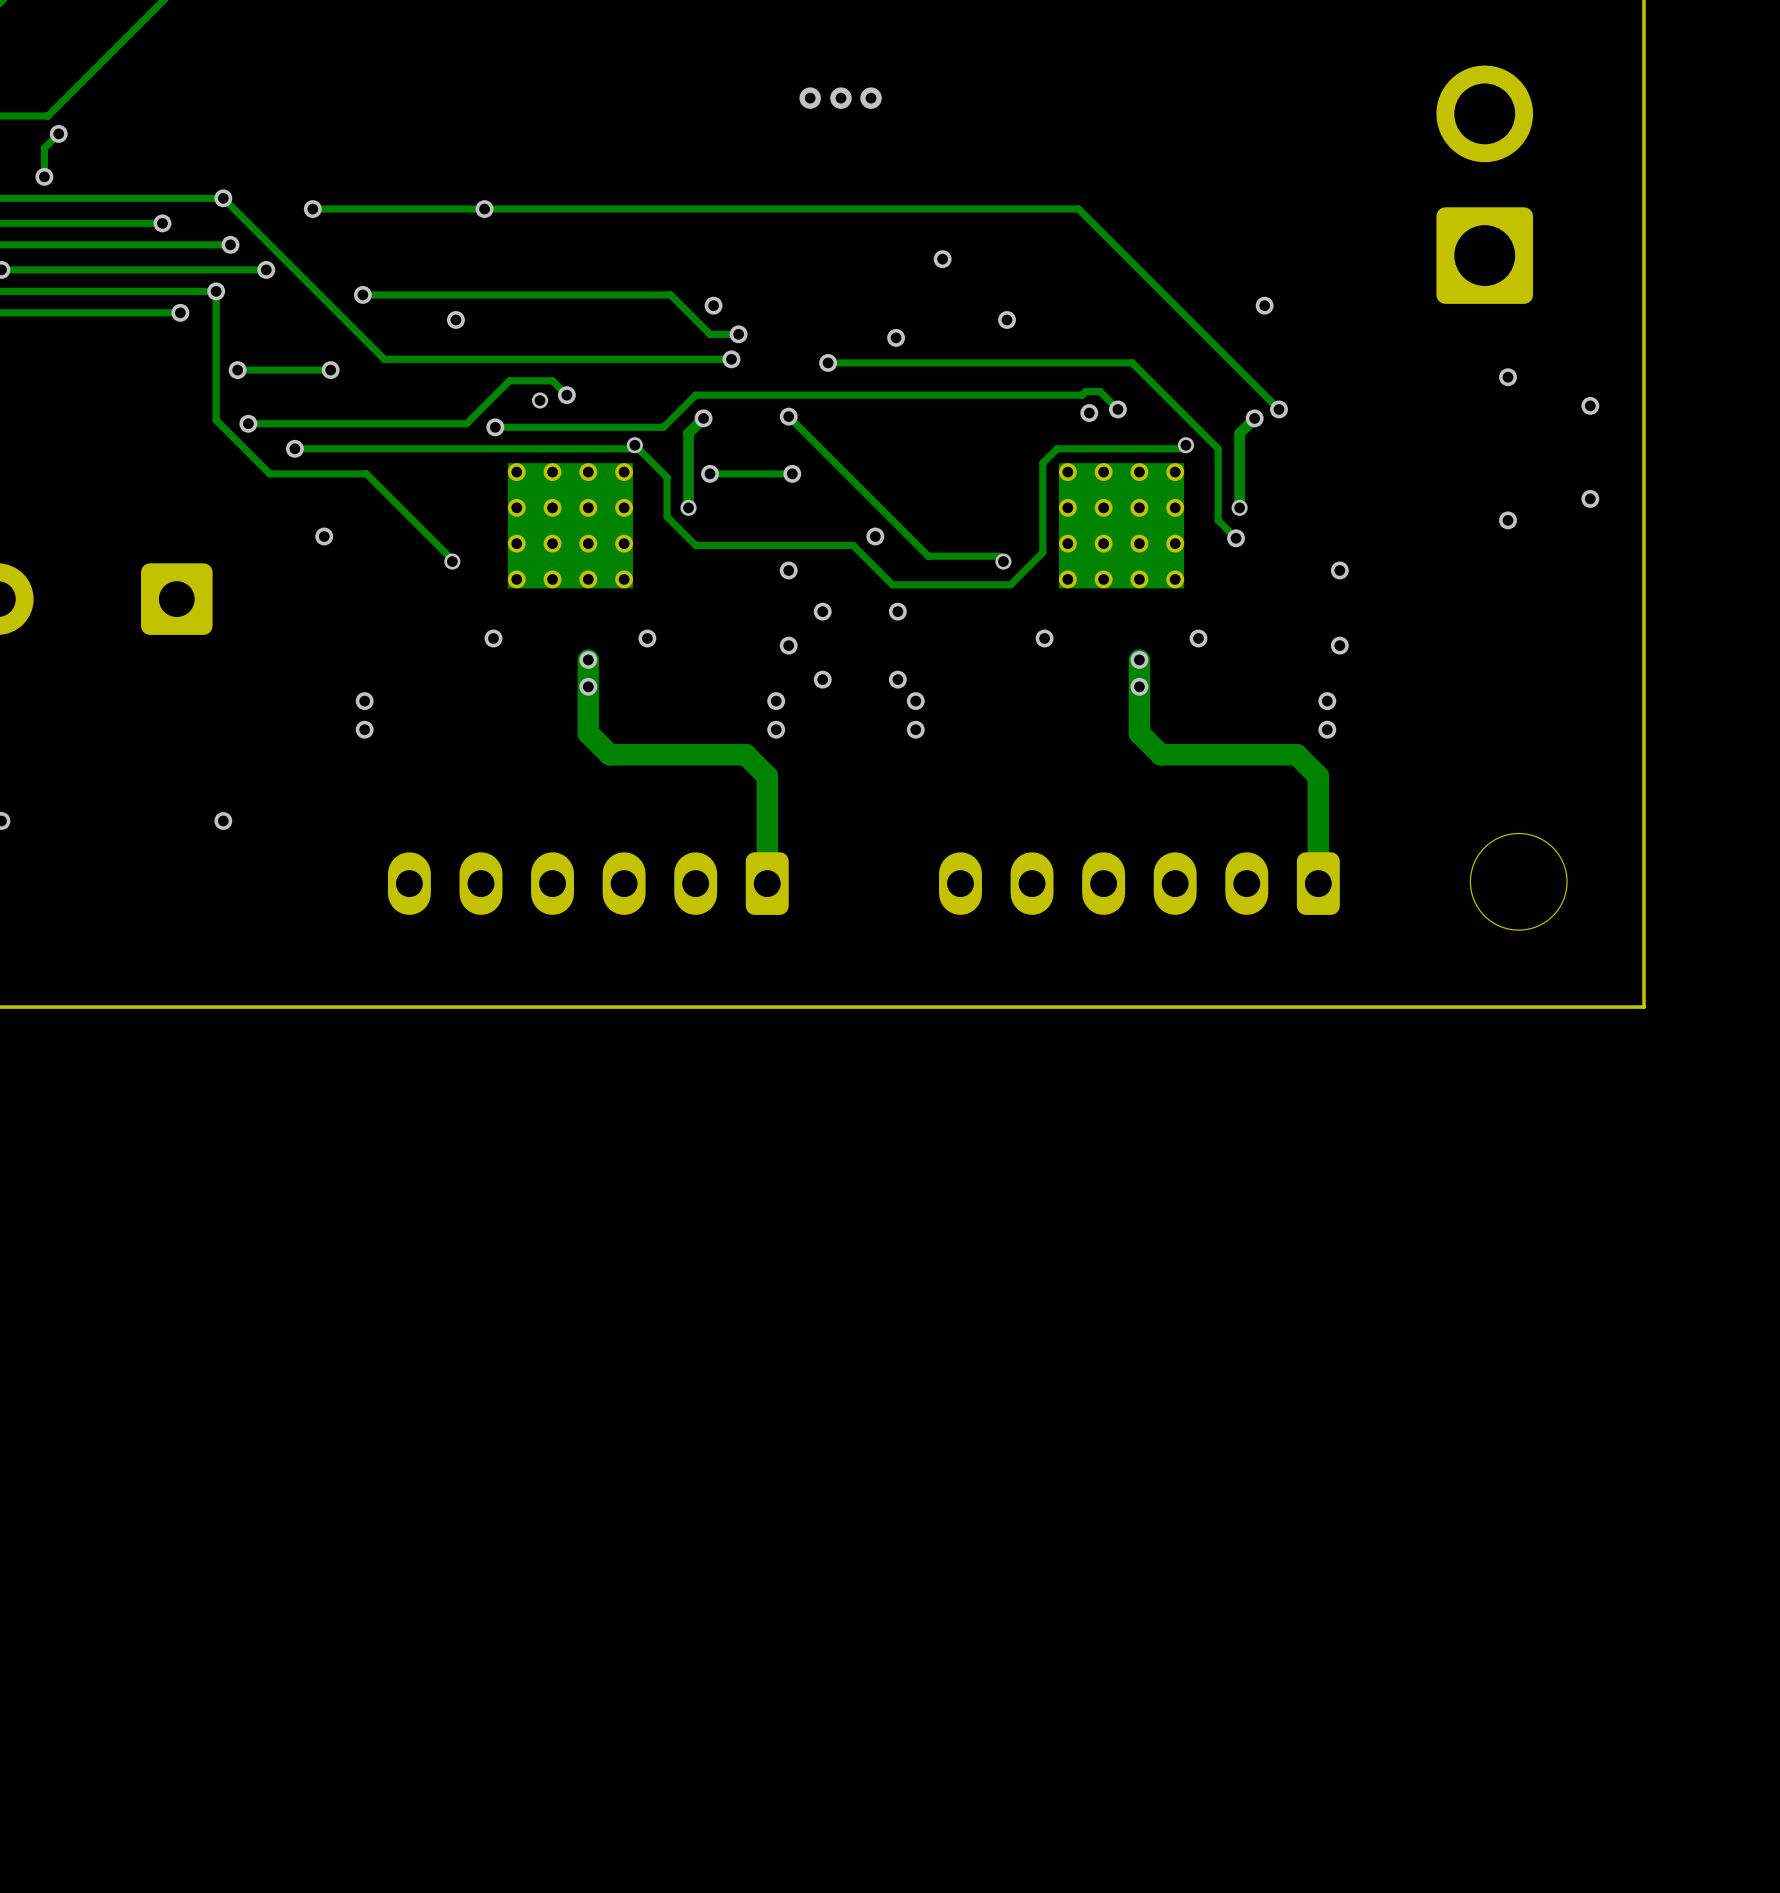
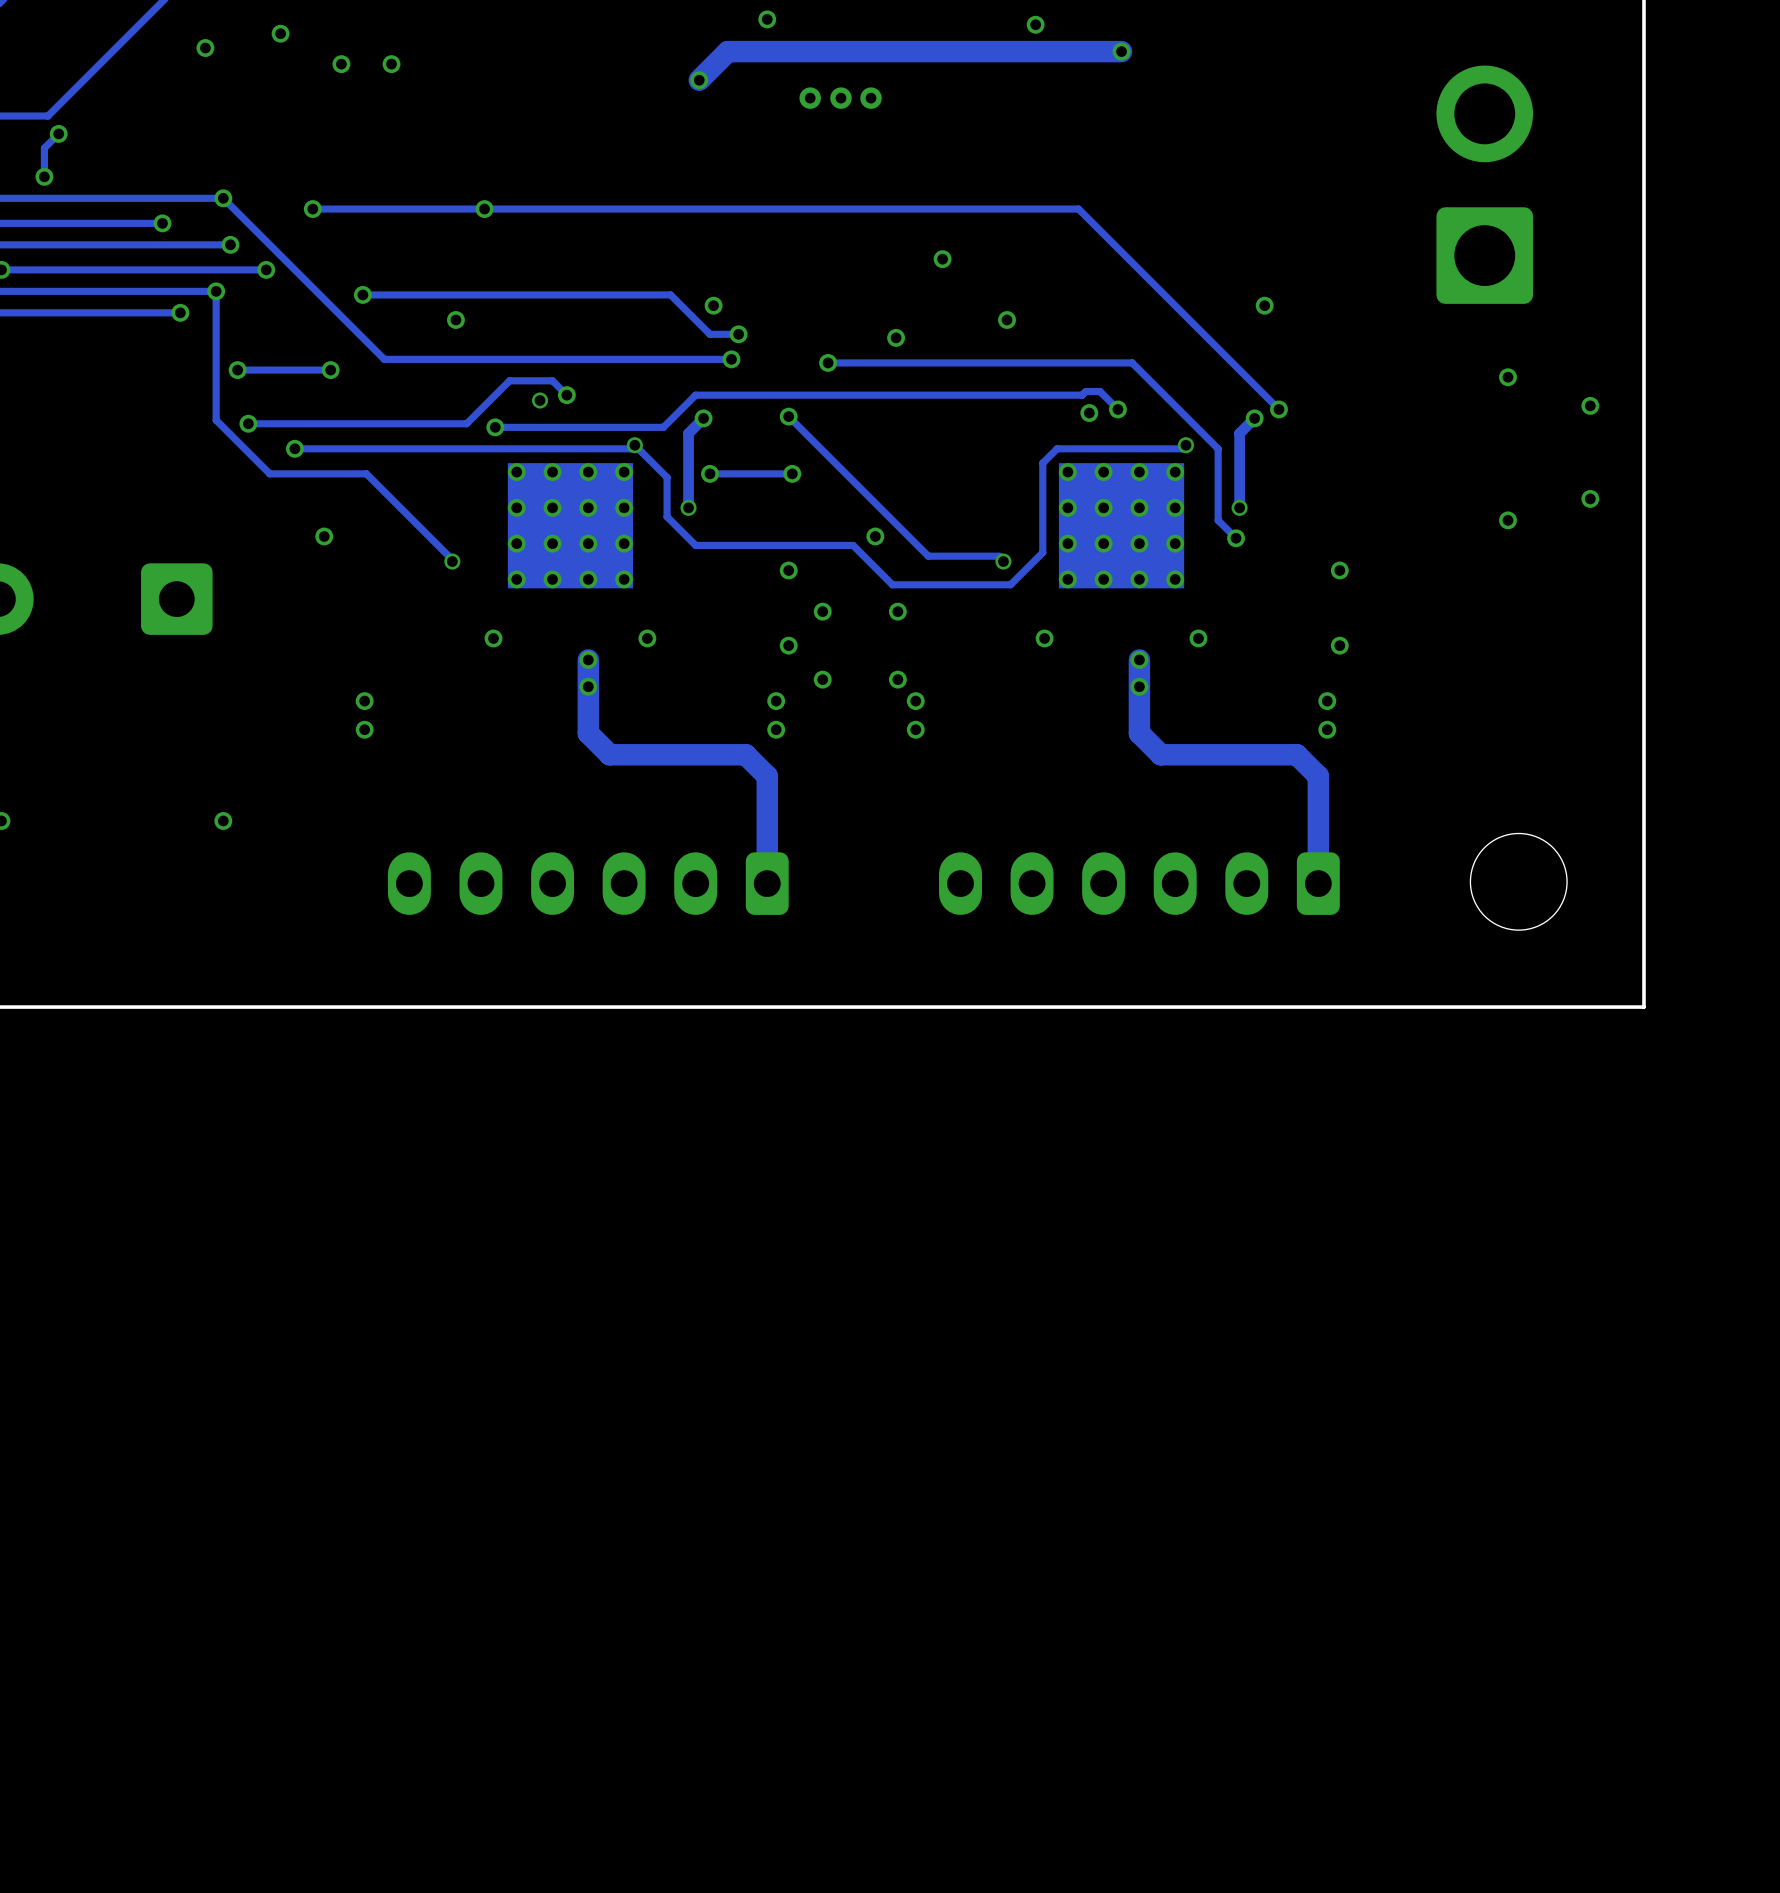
via: none -> (767, 19)
via: none -> (1035, 24)
via: none -> (280, 33)
via: none -> (205, 48)
track: none -> (1121, 51) (727, 51) (699, 80)
via: none -> (1121, 51)
via: none -> (341, 64)
via: none -> (391, 64)
via: none -> (699, 80)

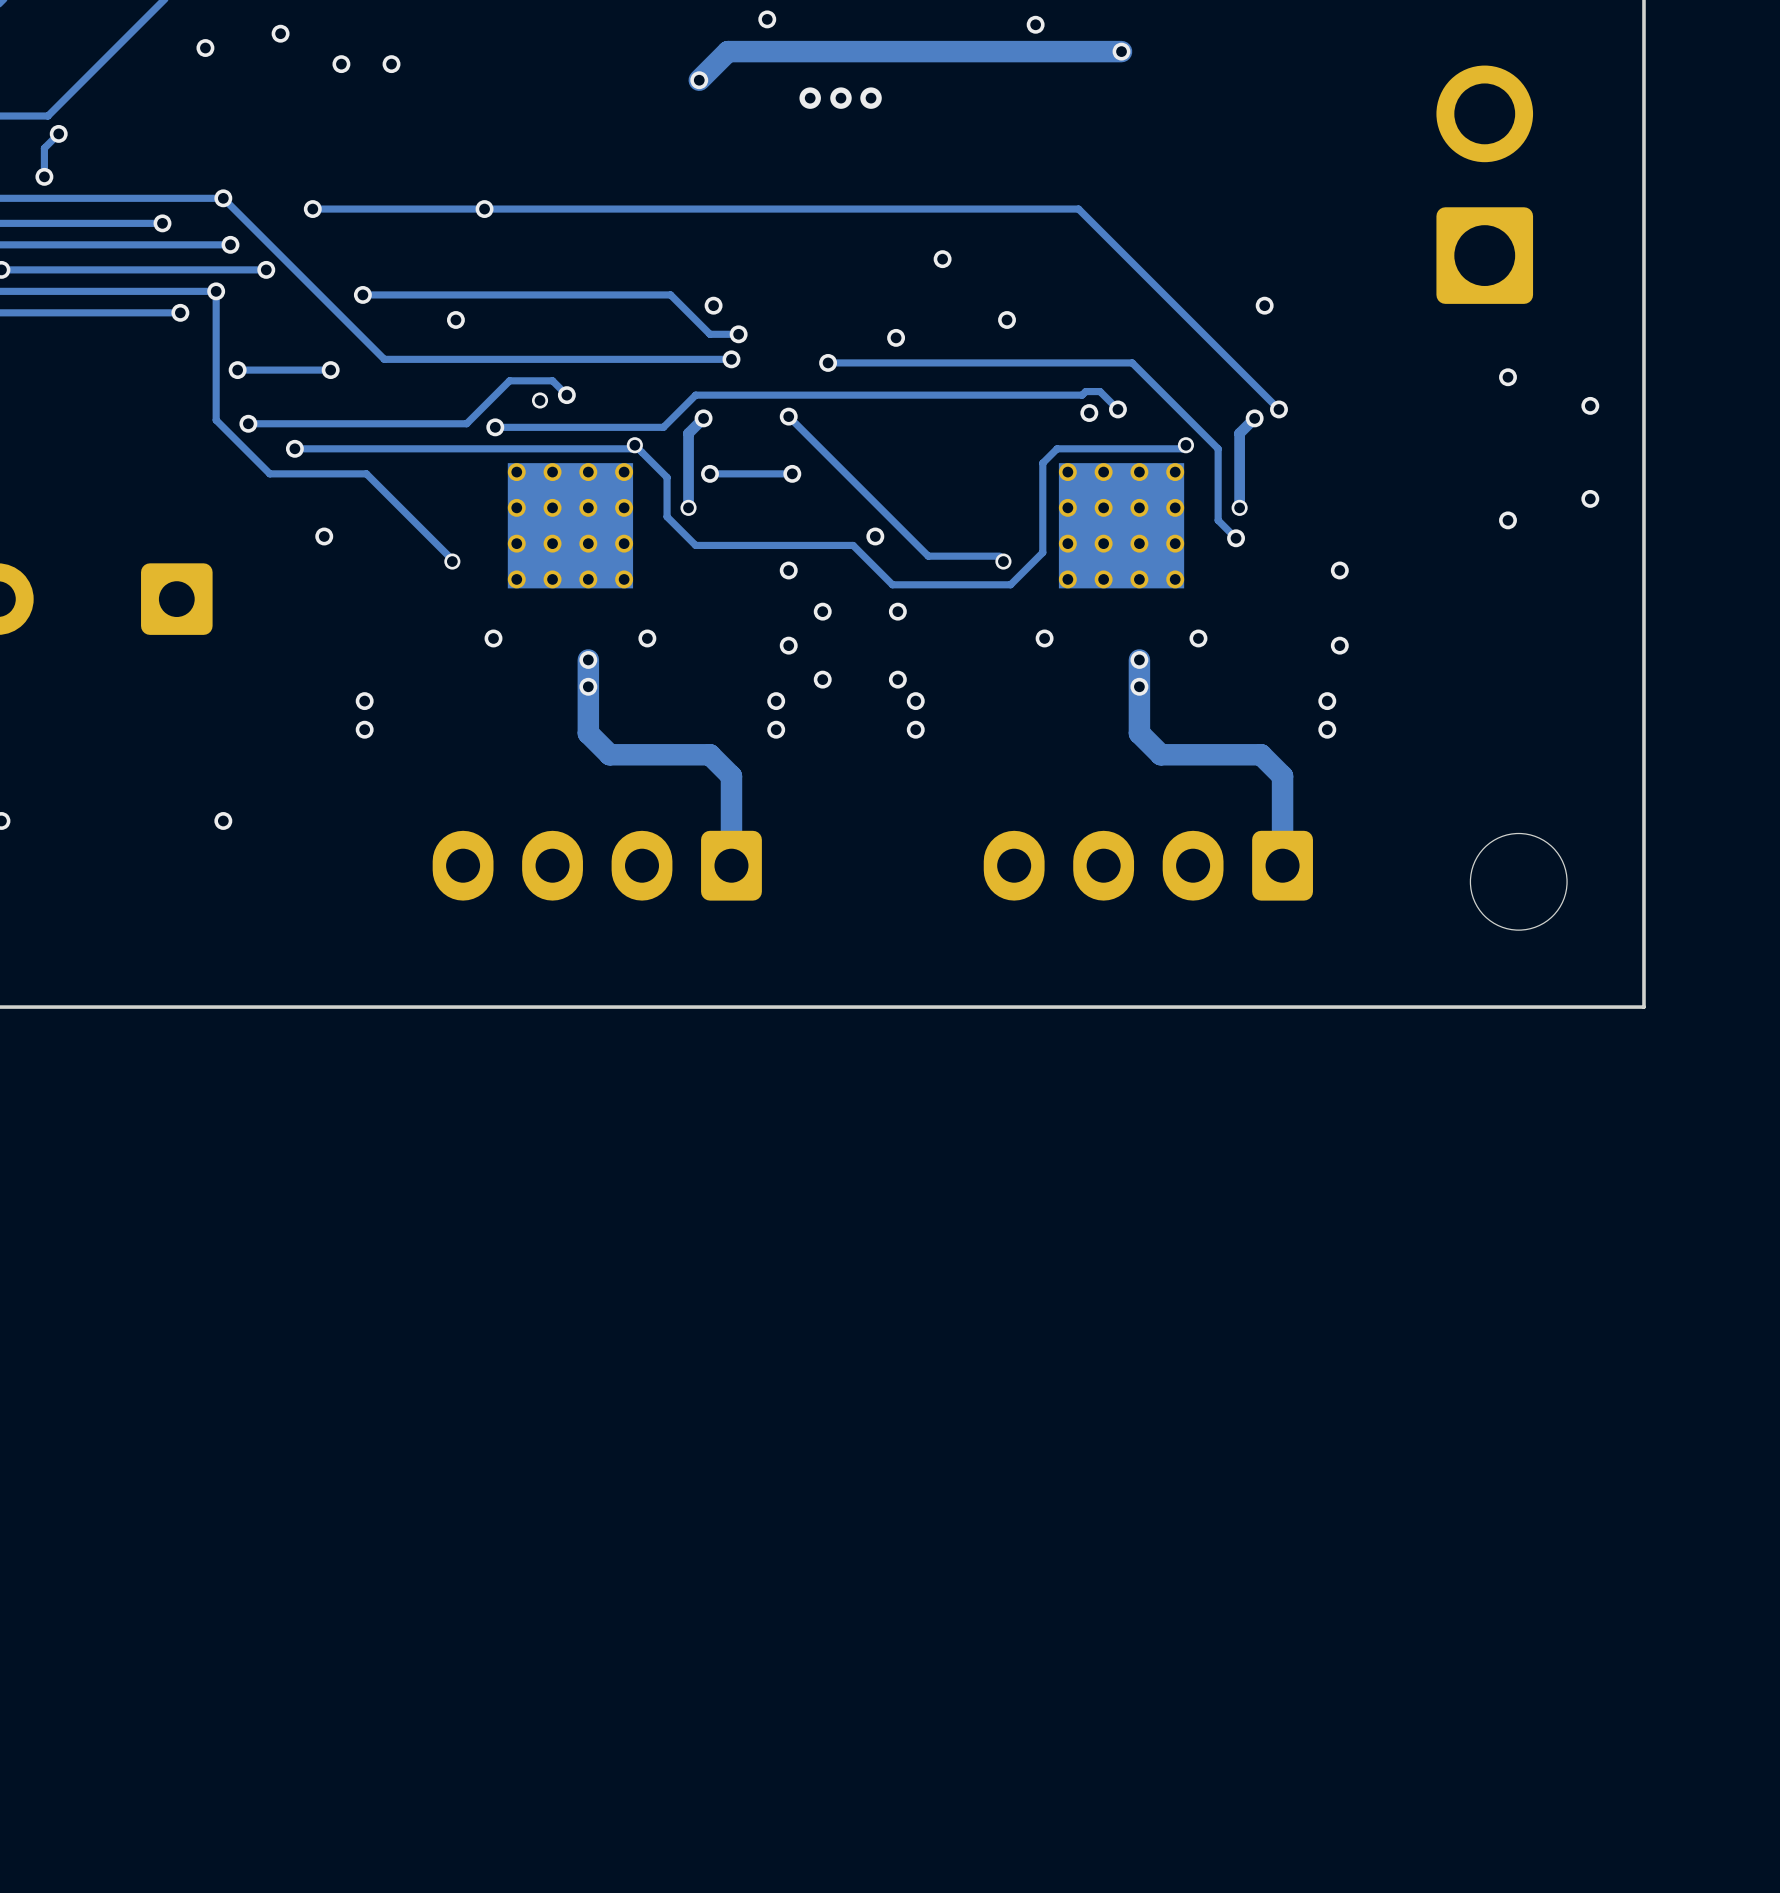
track: (710, 754) (745, 754) (767, 776) (767, 883) -> (710, 754) (731, 776) (731, 865)
track: (1261, 754) (1296, 754) (1318, 776) (1318, 883) -> (1261, 754) (1282, 776) (1282, 865)
part footprint: [387, 852, 789, 915] -> [432, 830, 762, 901]
part footprint: [939, 852, 1340, 915] -> [983, 830, 1313, 901]

